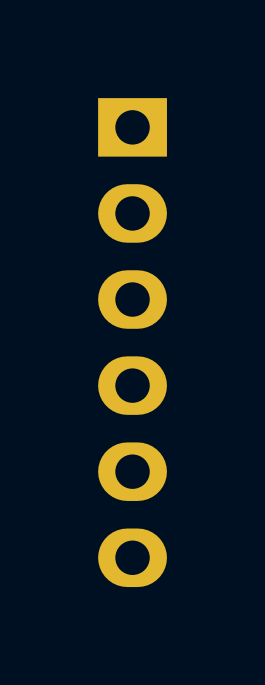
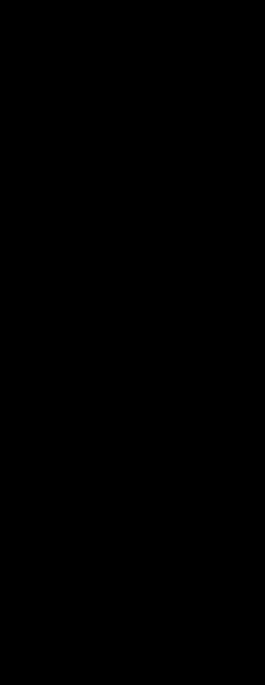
part: (132, 342) -> none

